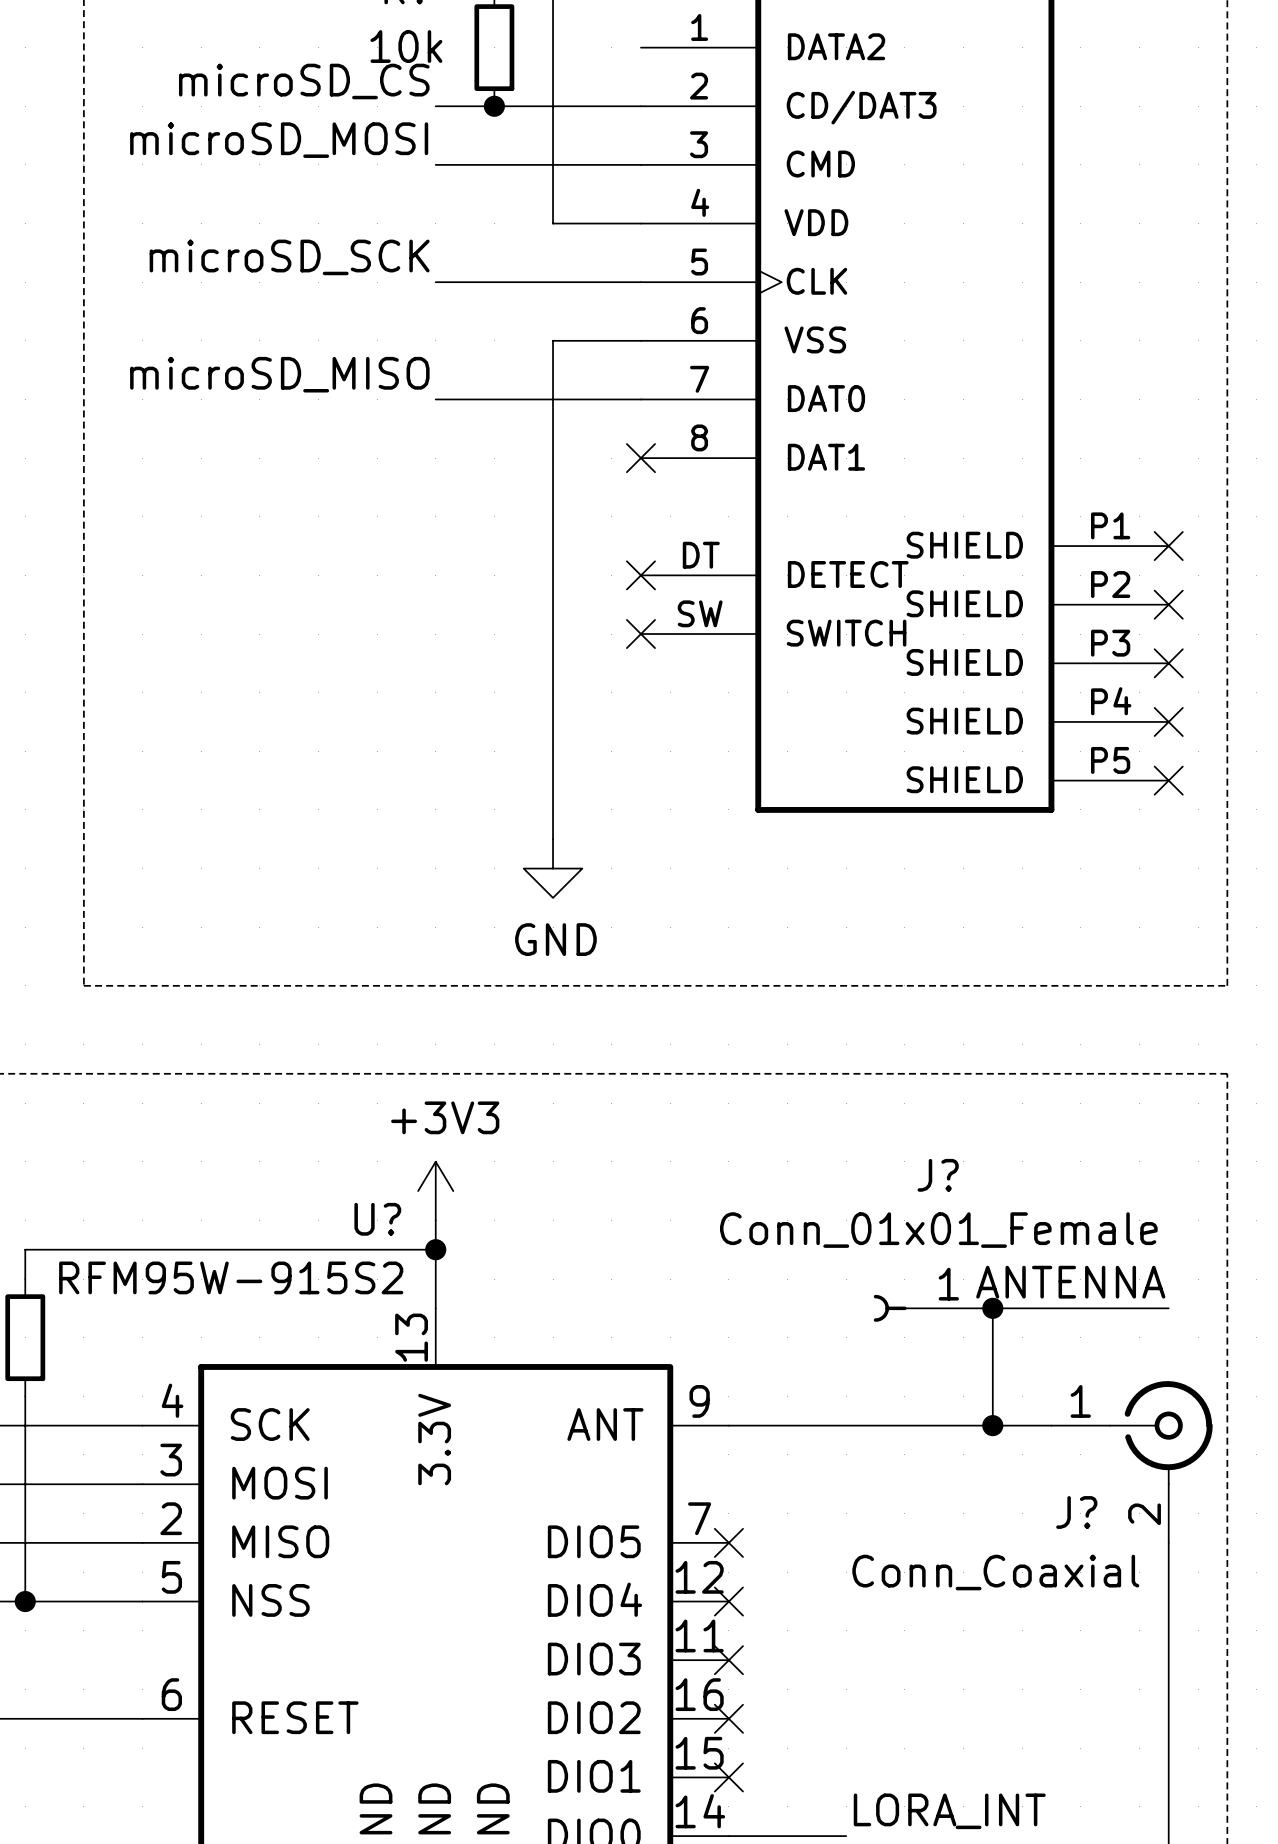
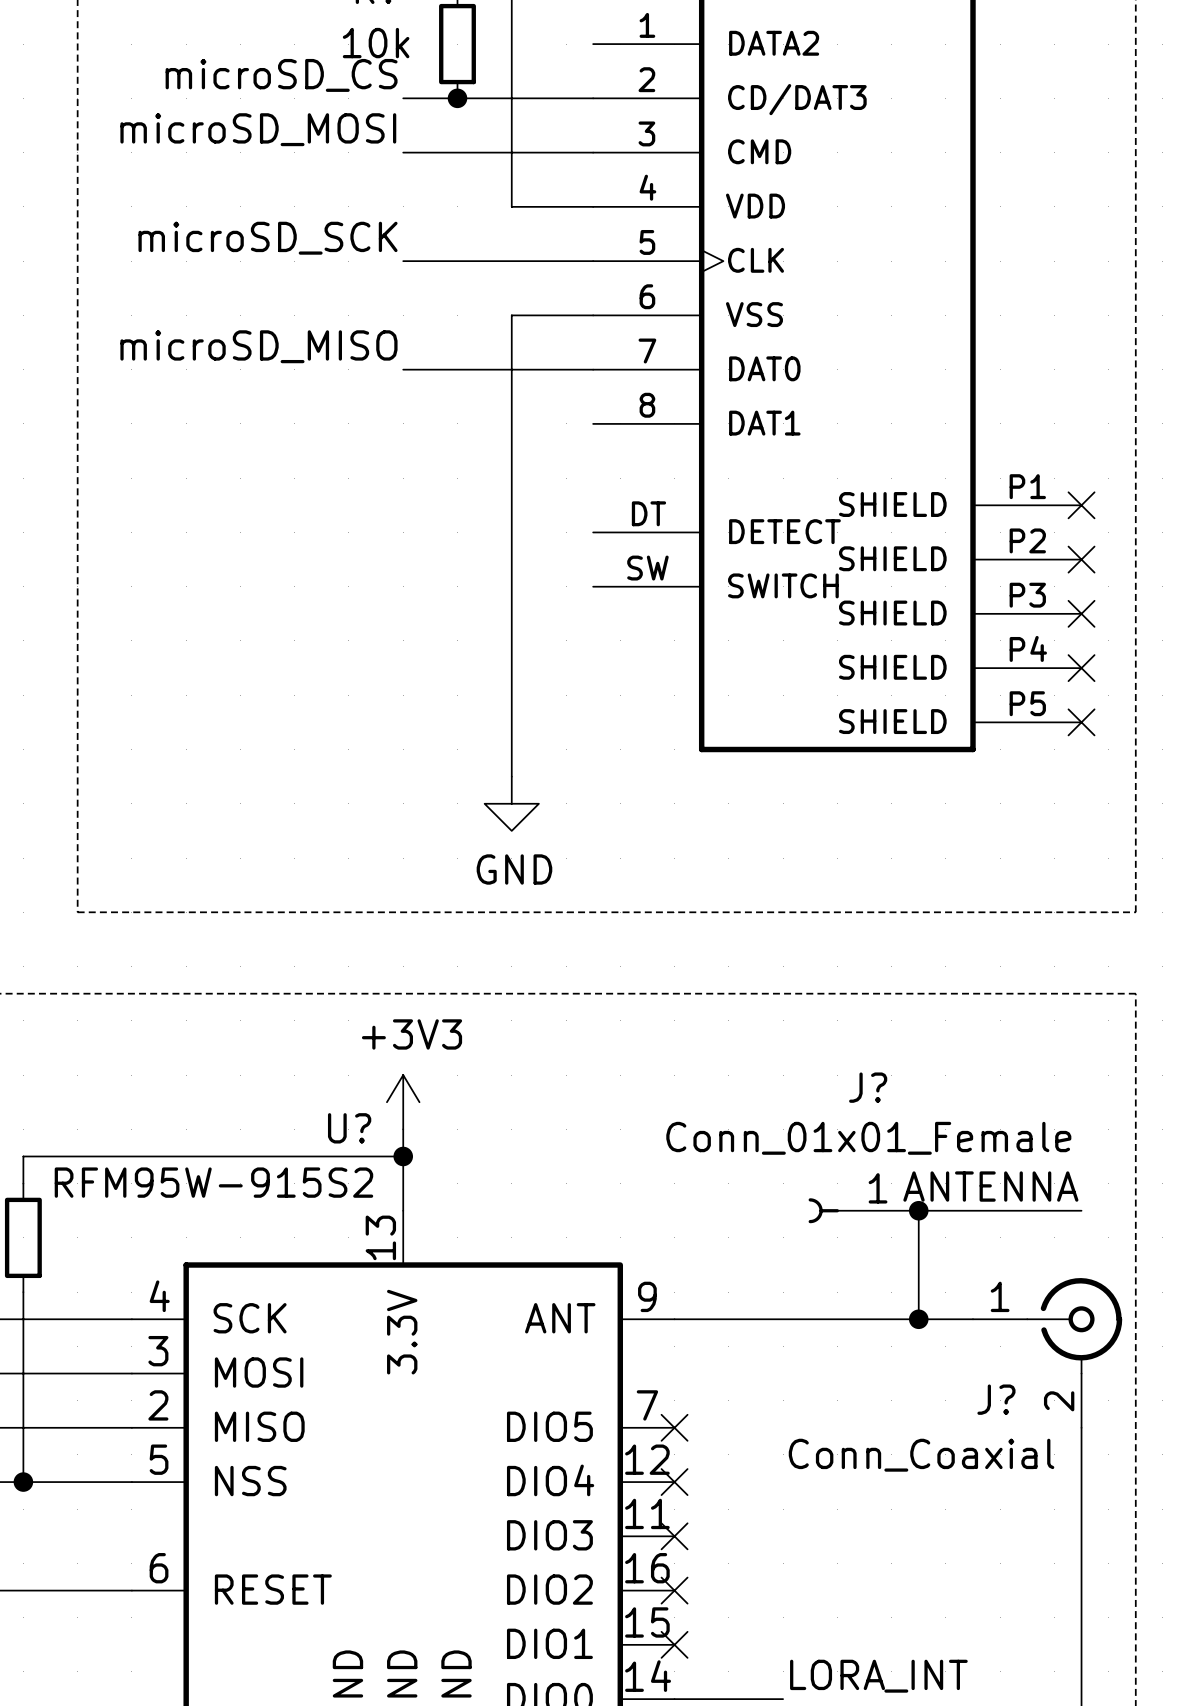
no-connect mark: (640, 458) -> none
no-connect mark: (640, 575) -> none
no-connect mark: (640, 634) -> none

